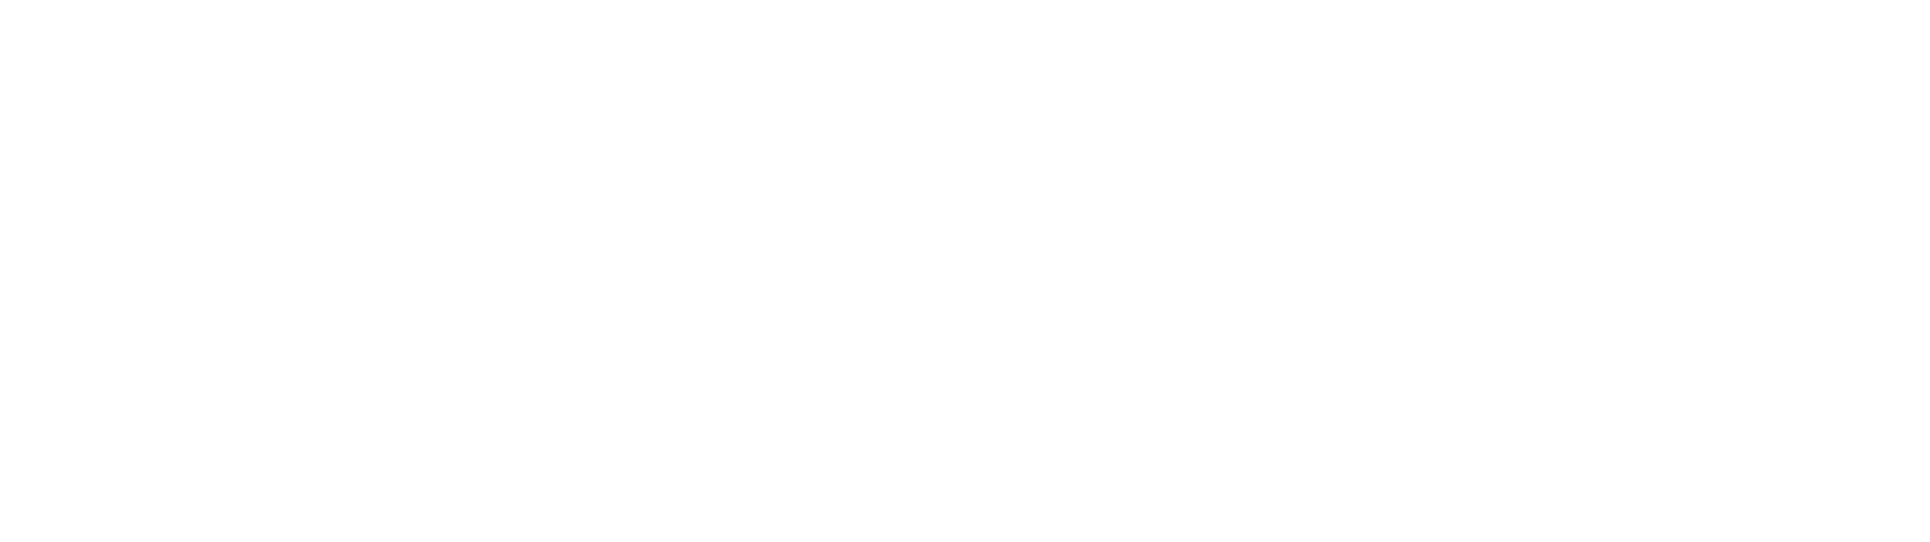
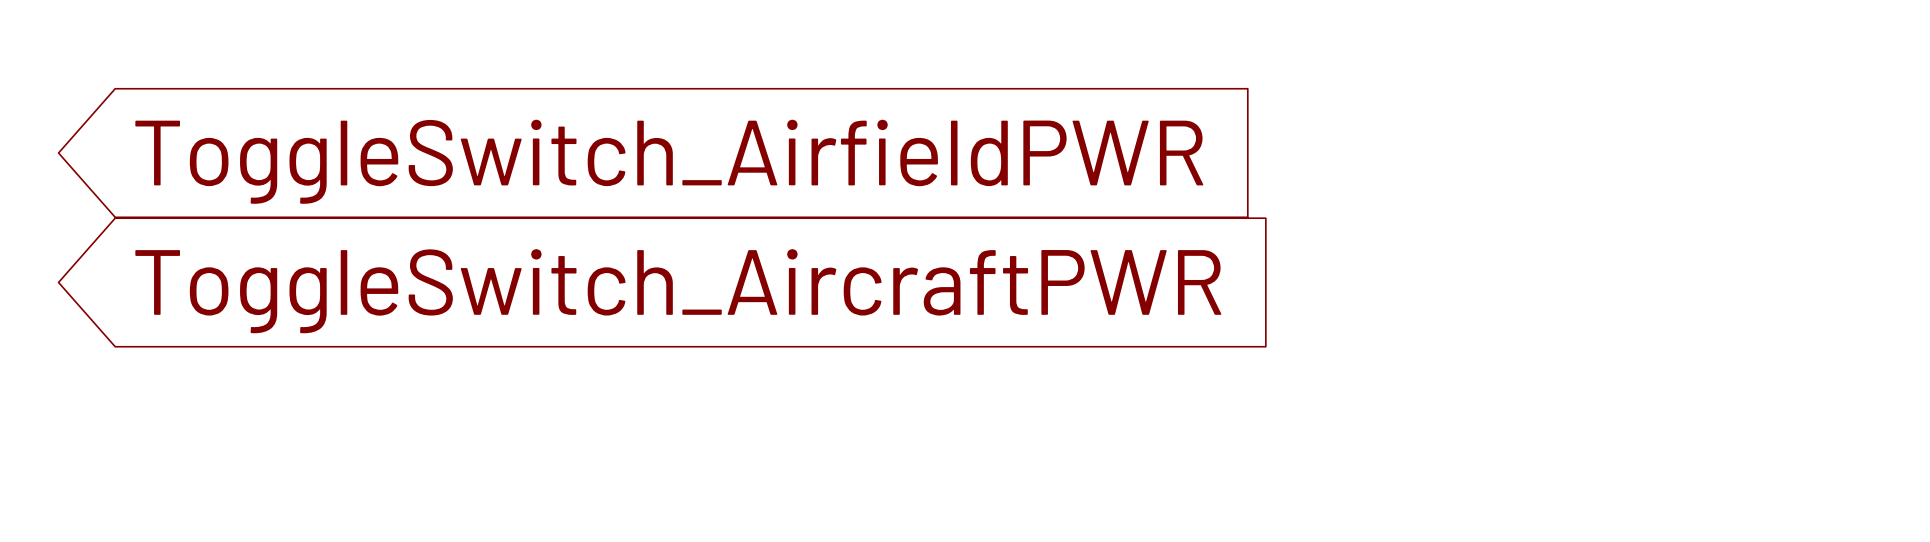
global label: none -> ToggleSwitch_AirfieldPWR (669, 161)
global label: none -> ToggleSwitch_AircraftPWR (678, 291)

